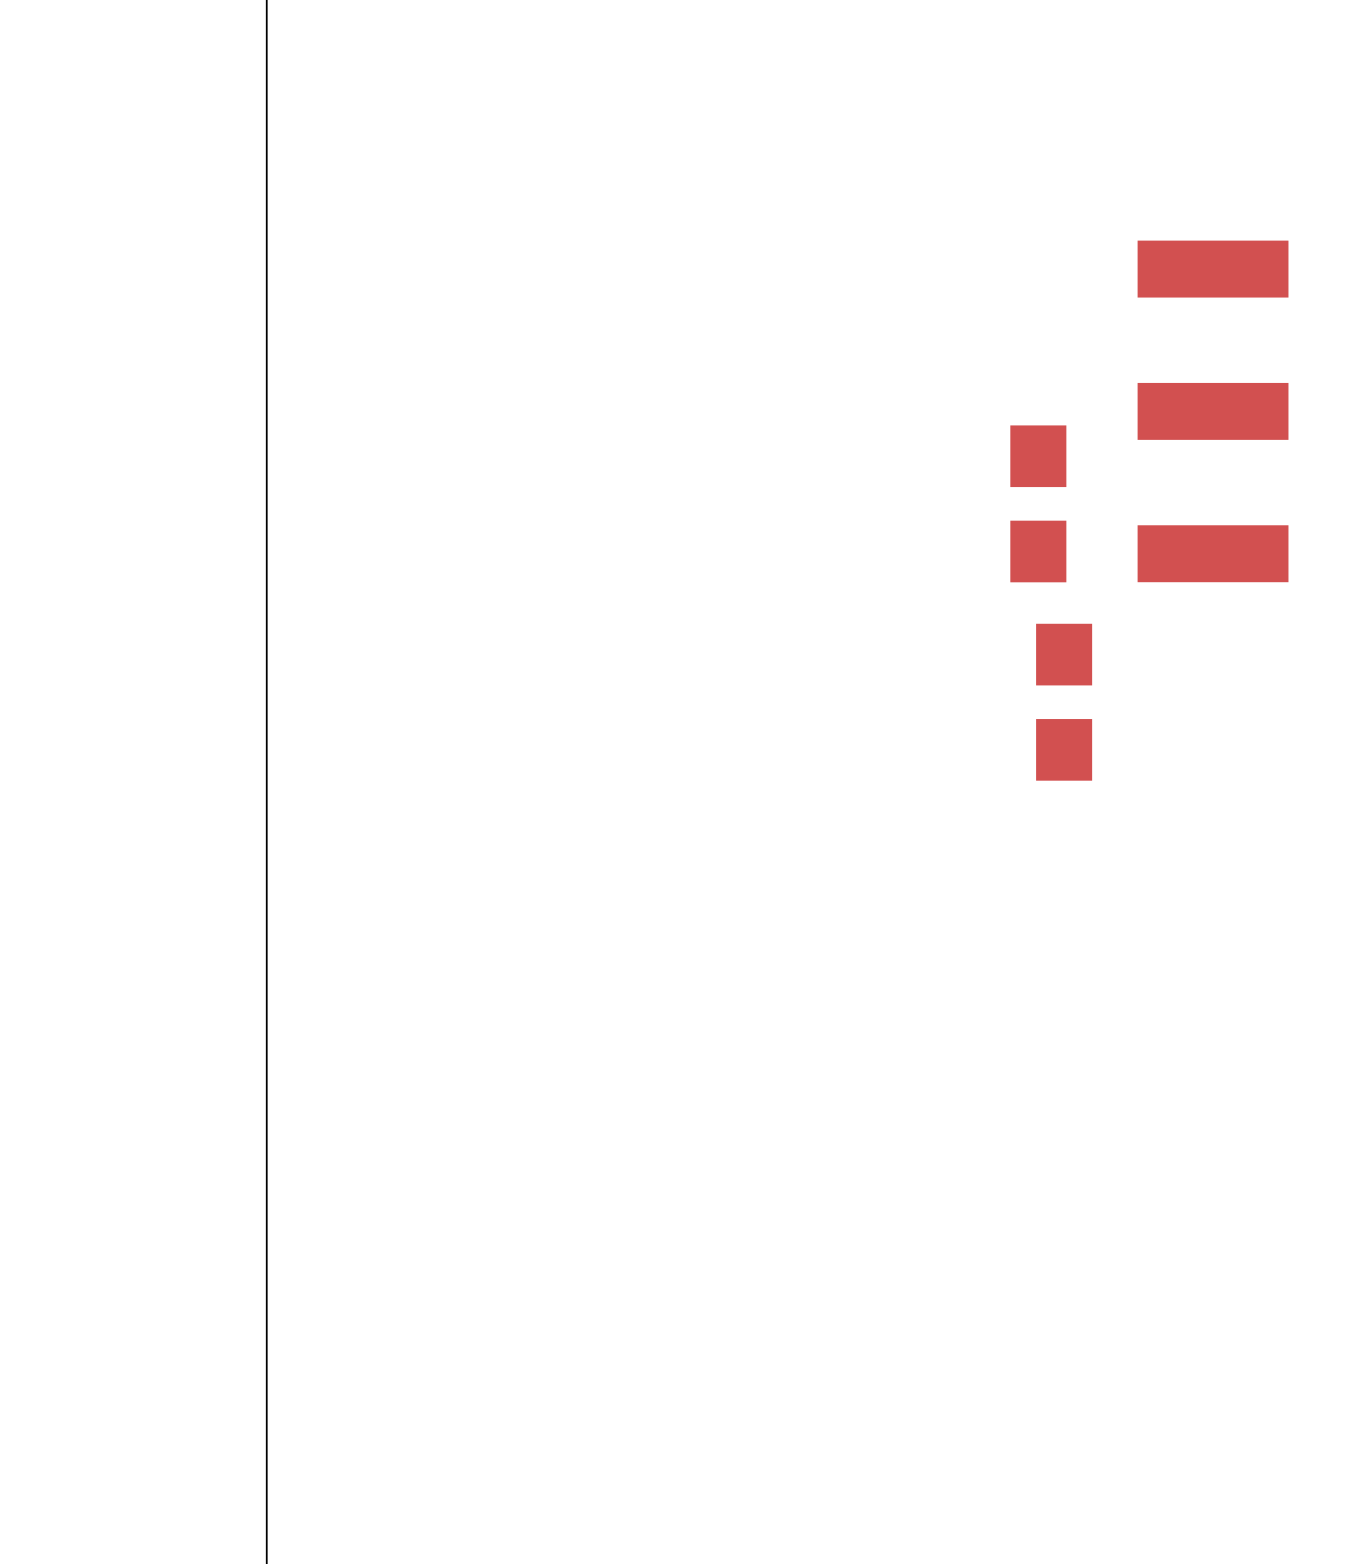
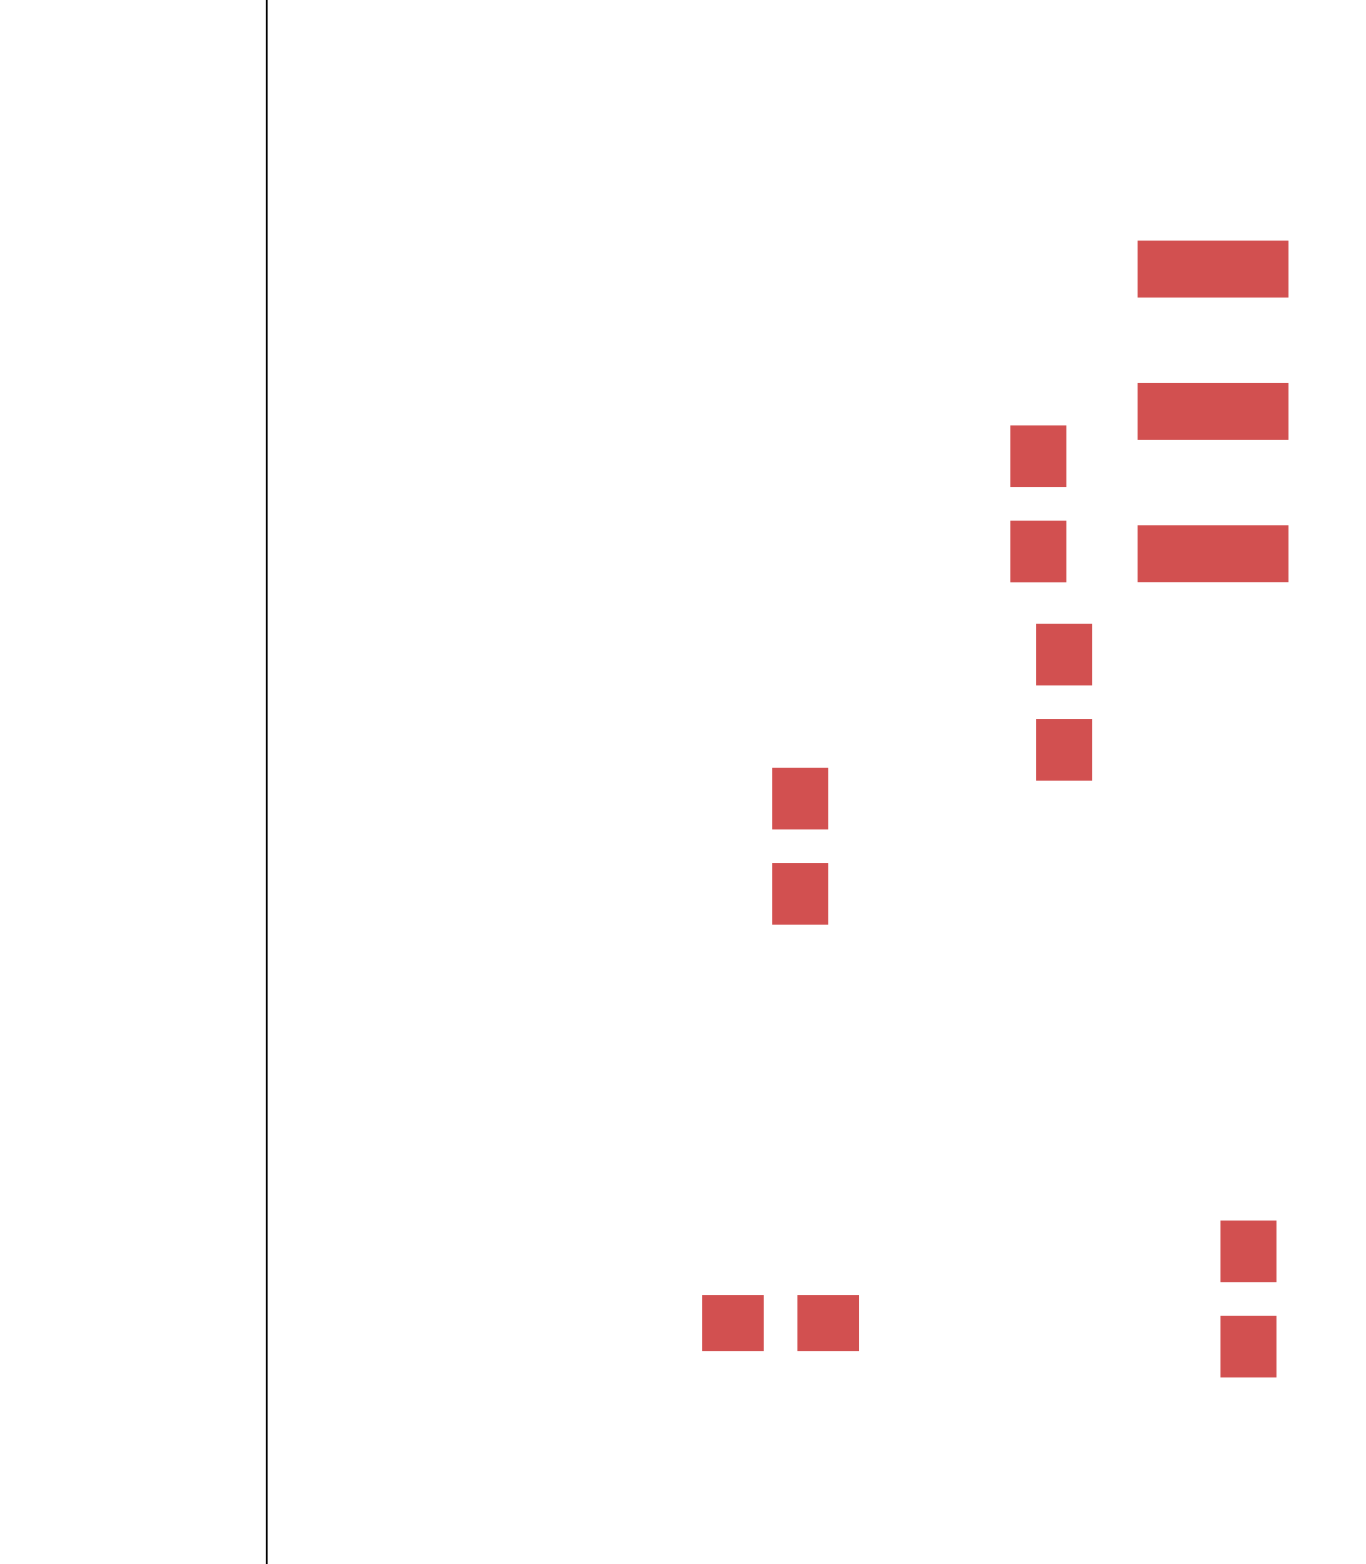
part: none -> (800, 846)
part: none -> (1248, 1298)
part: none -> (780, 1323)

